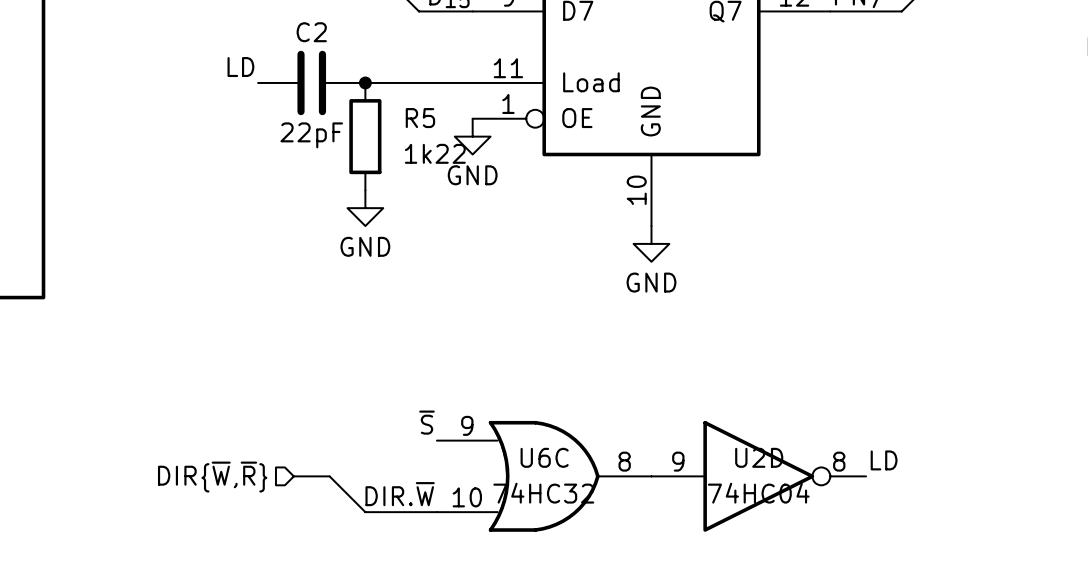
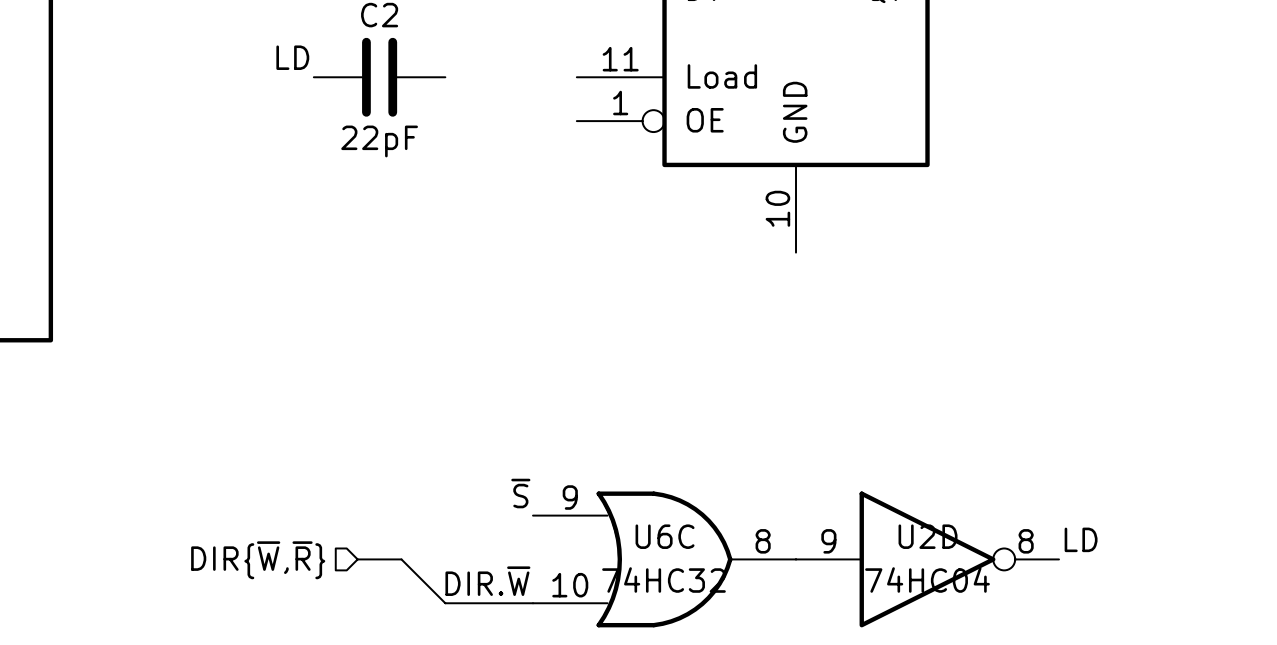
wire: (365, 82) (472, 82) -> none
junction: (365, 82) -> none
R5: 1k22 (365, 136) -> none
power symbol: GND (472, 136) -> none
power symbol: GND (365, 208) -> none
power symbol: GND (651, 243) -> none

